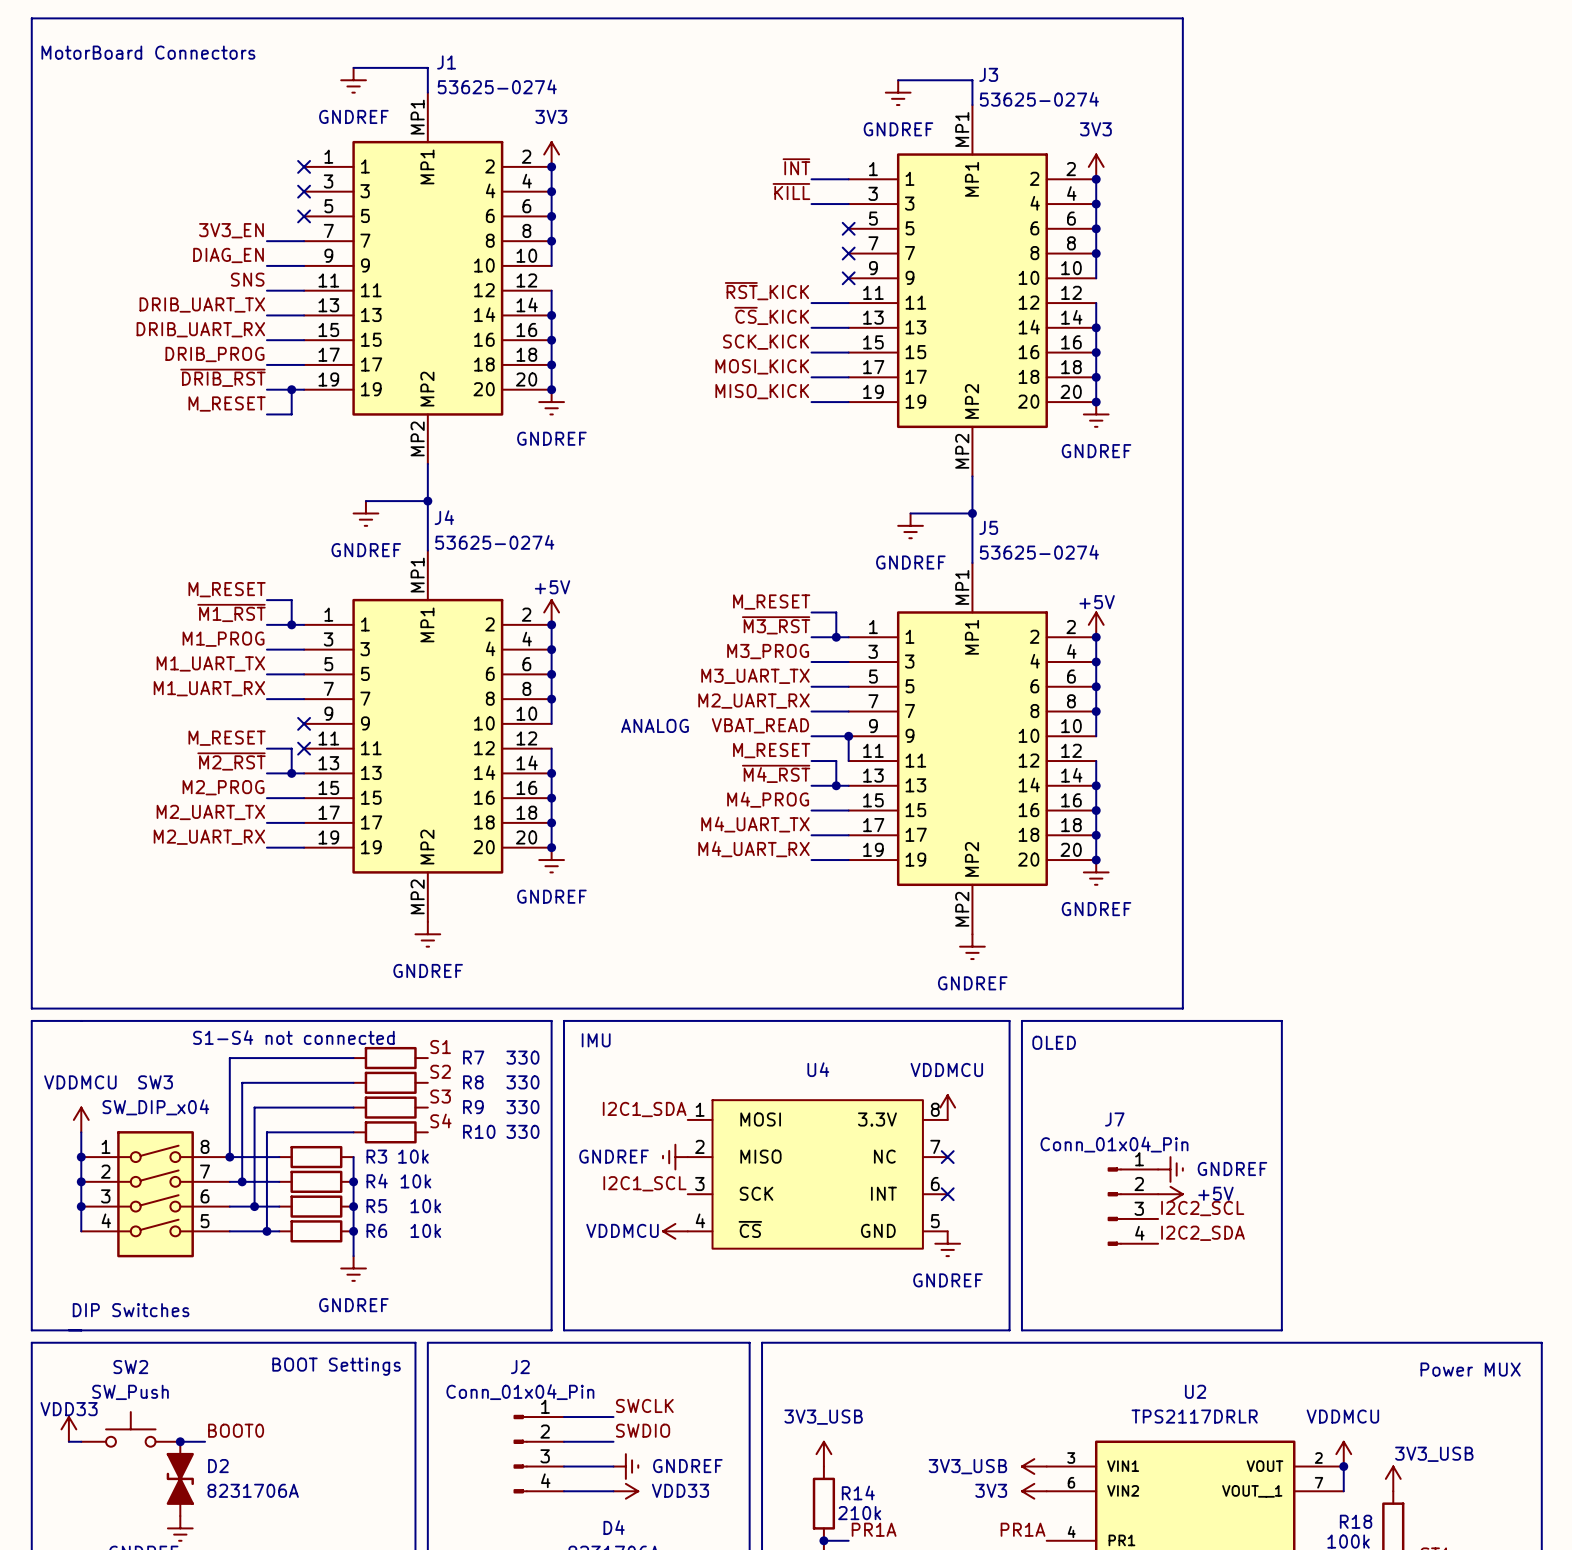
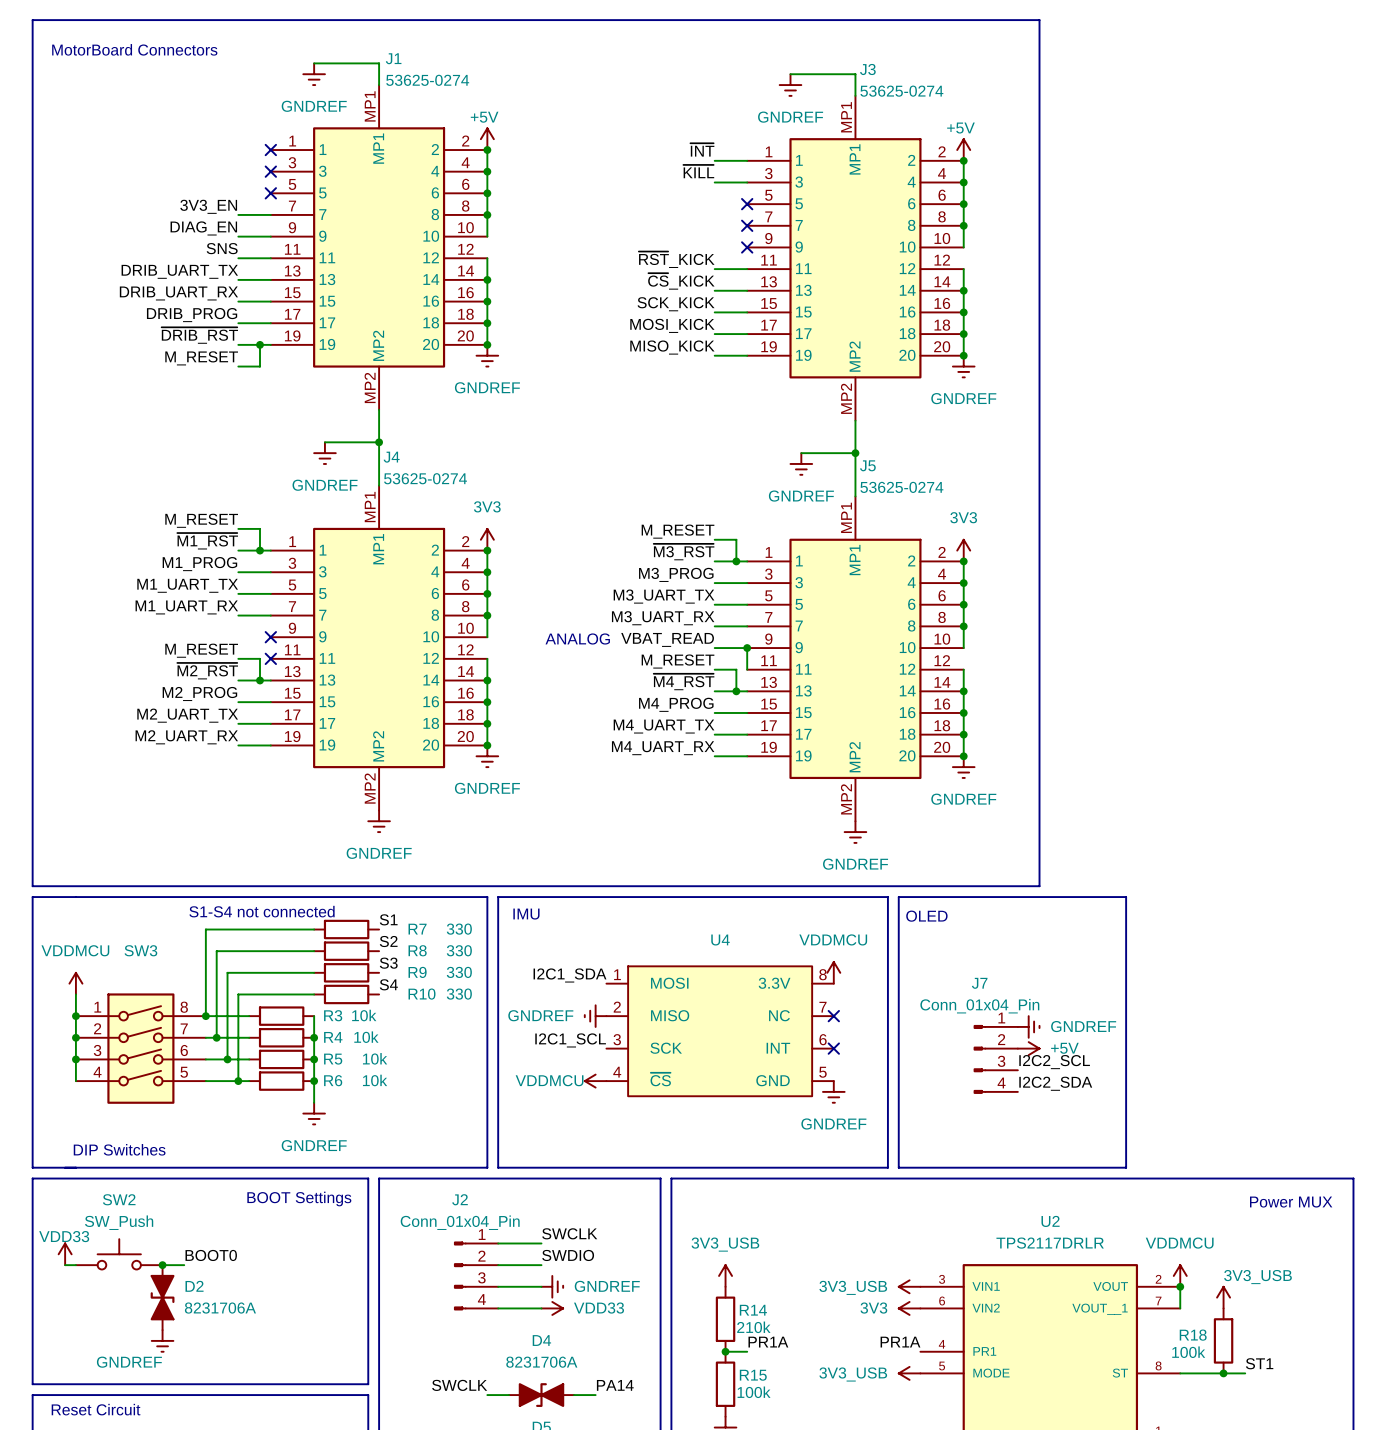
power symbol: 3V3 (551, 154) -> +5V (487, 139)
power symbol: 3V3 (1096, 166) -> +5V (963, 150)
power symbol: +5V (551, 612) -> 3V3 (487, 539)
power symbol: +5V (1096, 624) -> 3V3 (963, 550)
label: M2_UART_RX (753, 701) -> M3_UART_RX (663, 618)
SW3 value: SW_DIP_x04 (155, 1107) -> none

